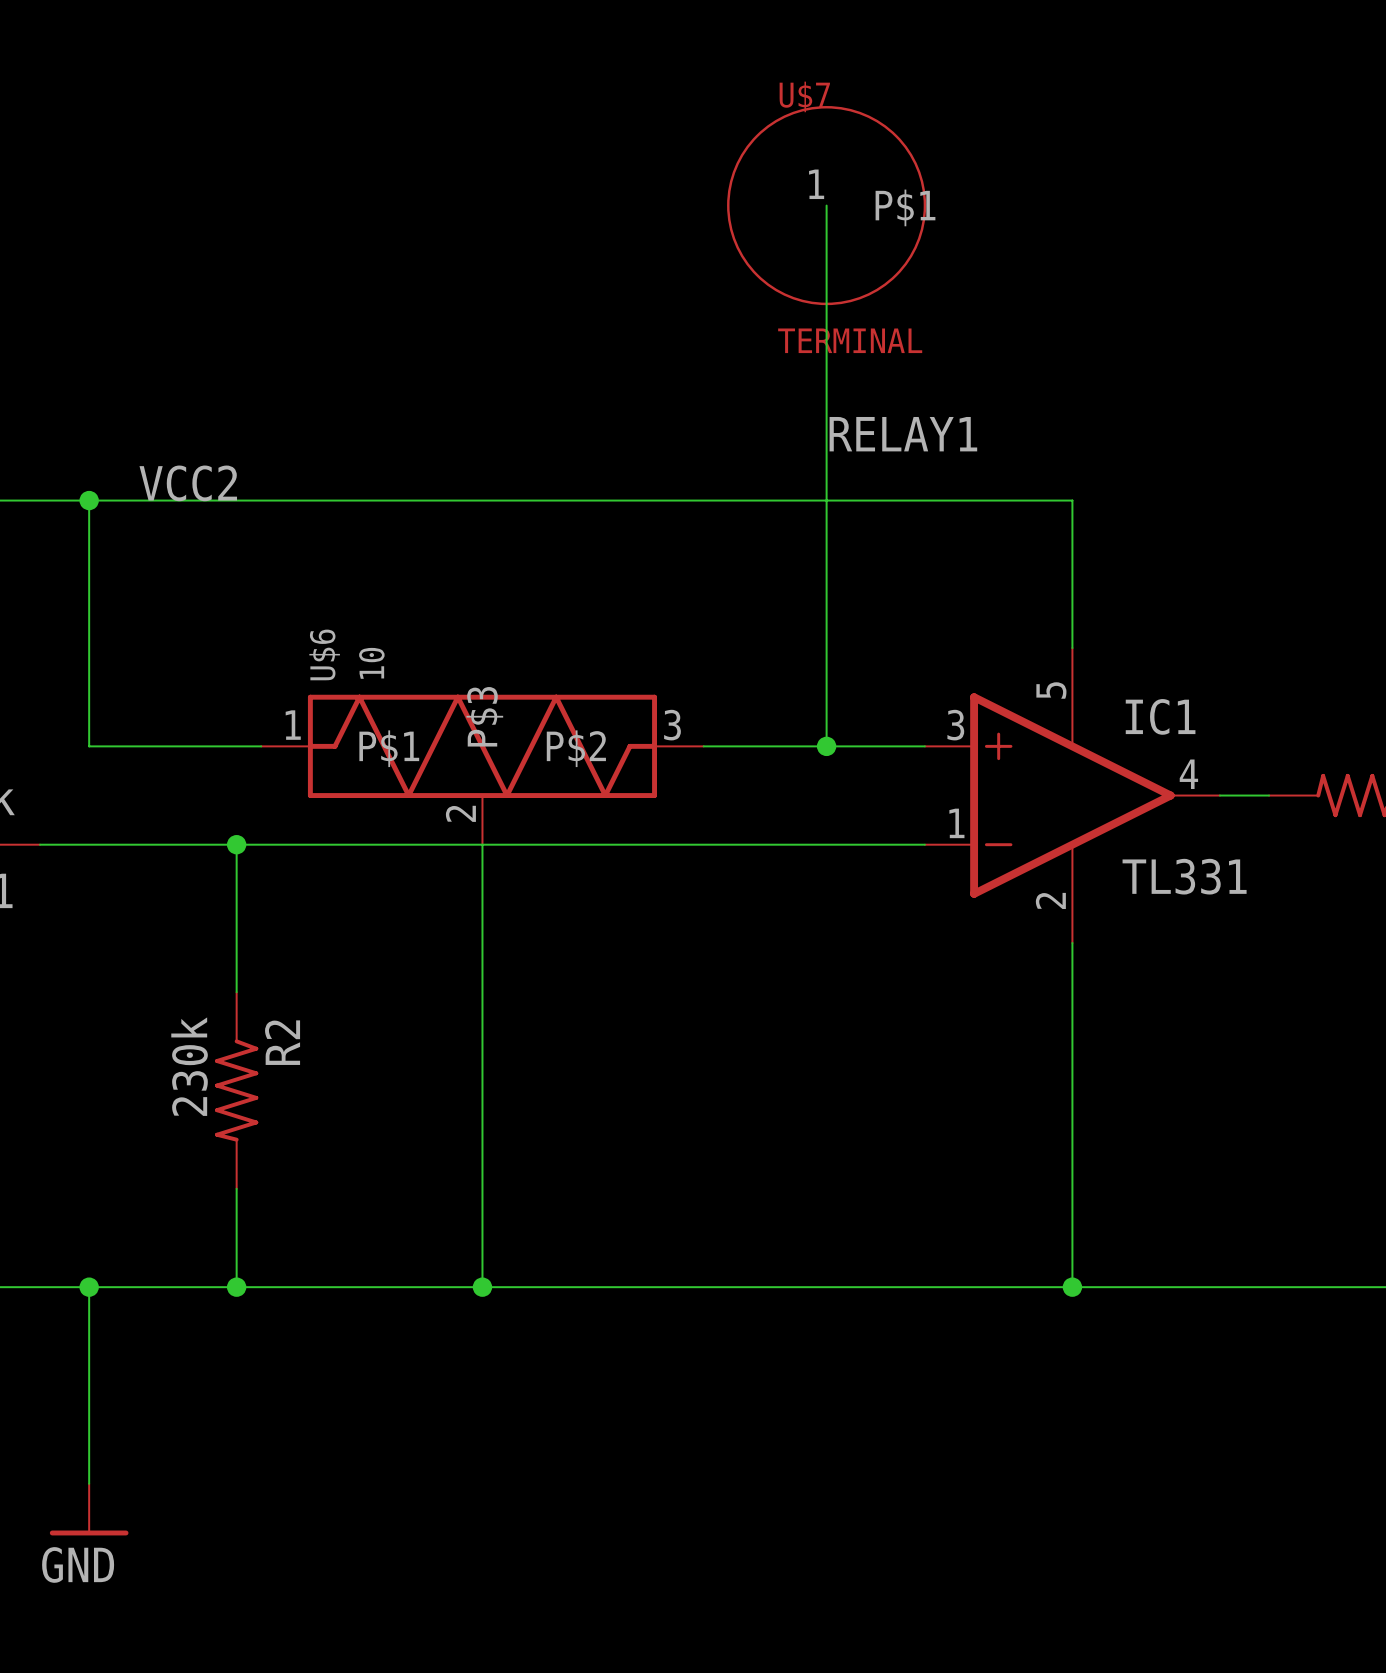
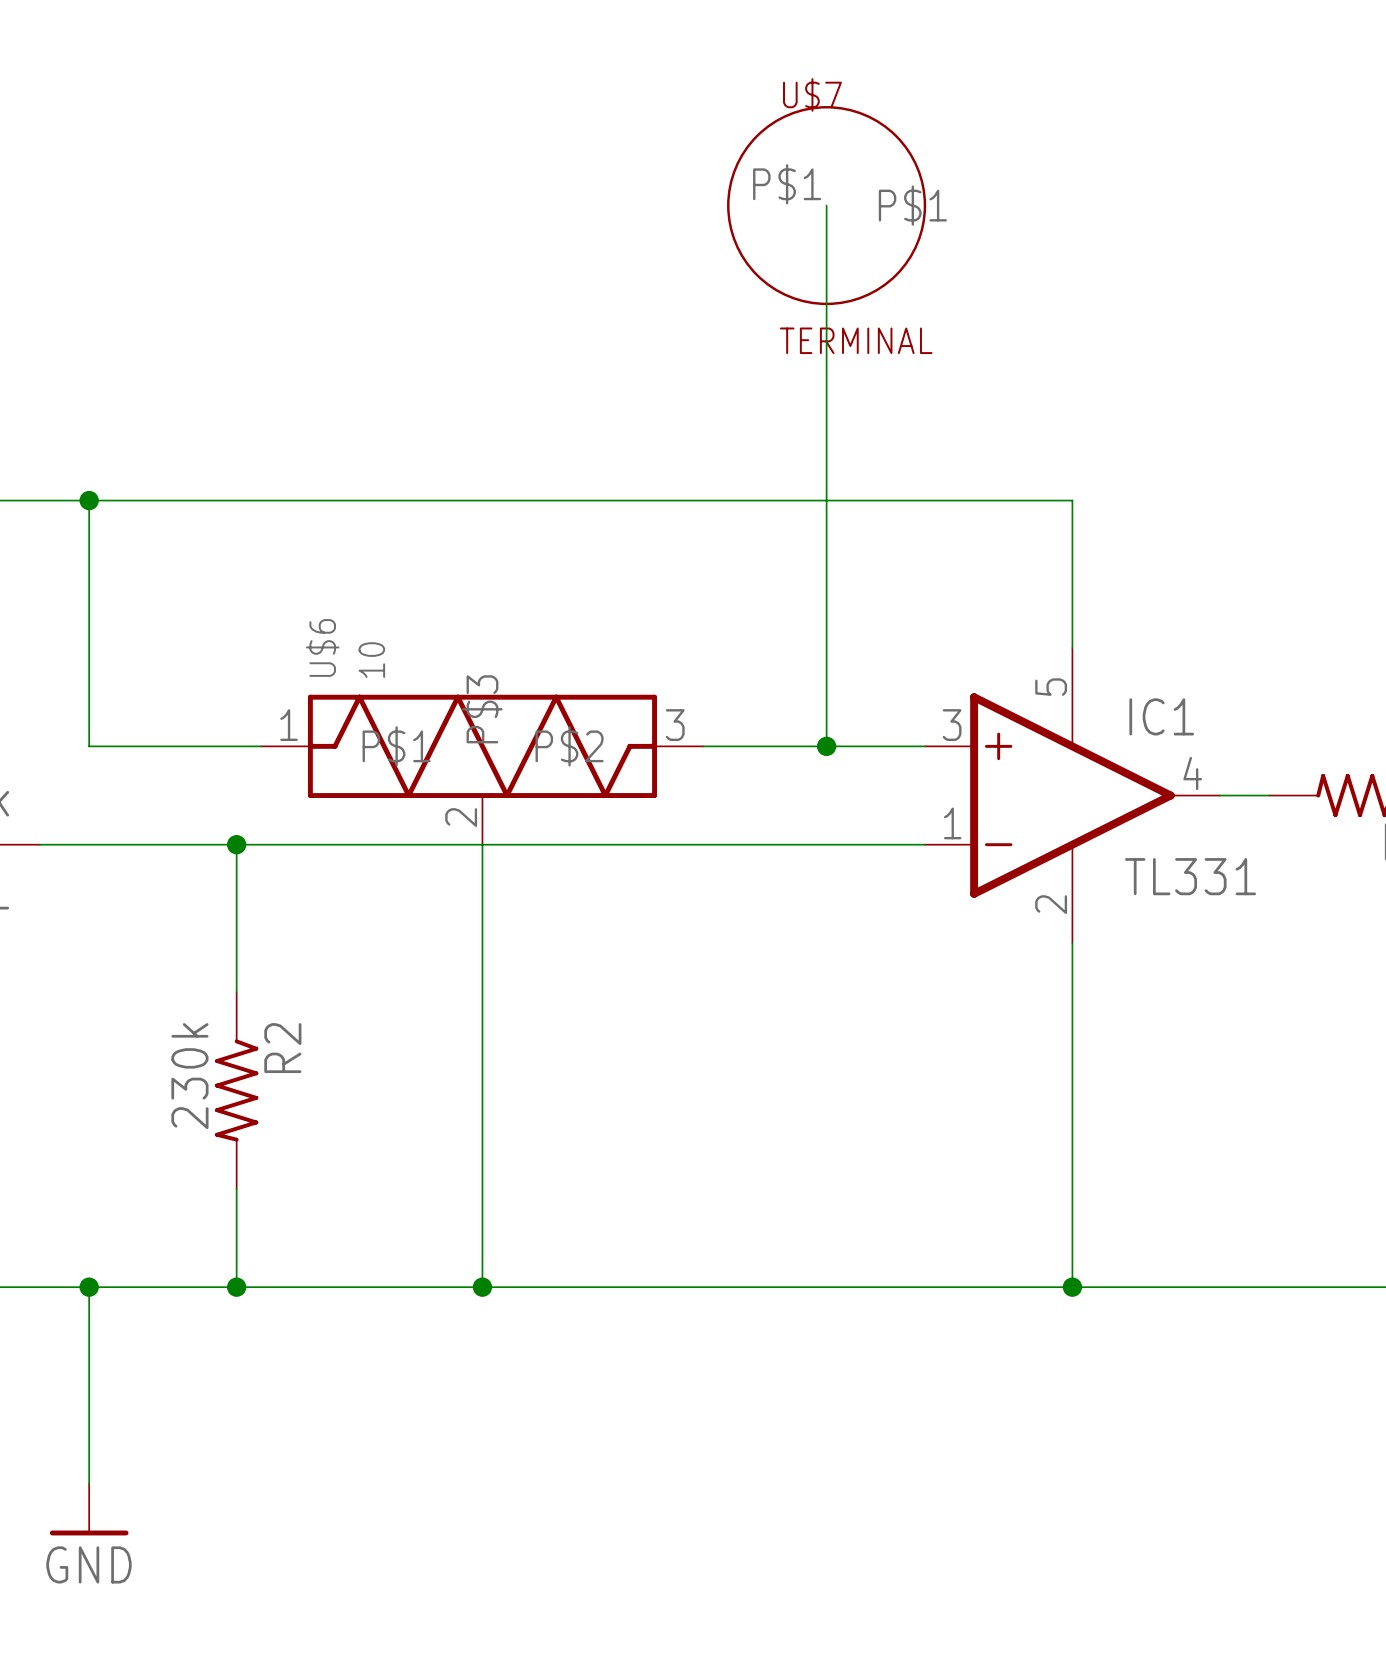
U$7 pin number: 1 (816, 184) -> P$1 (787, 184)
label: RELAY1 (903, 434) -> none
label: VCC2 (188, 483) -> none

